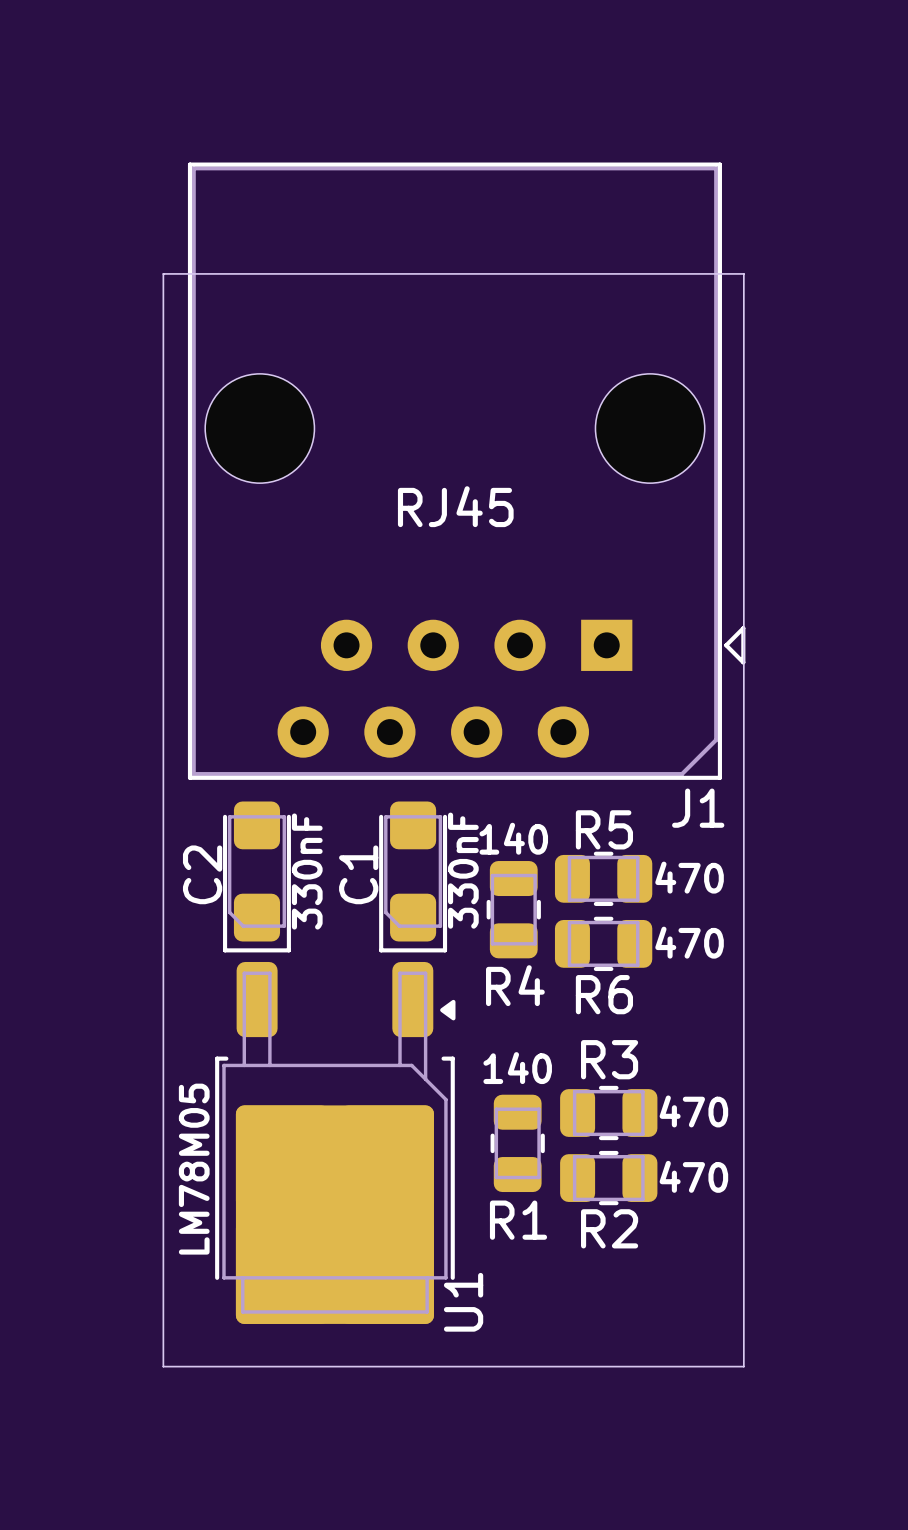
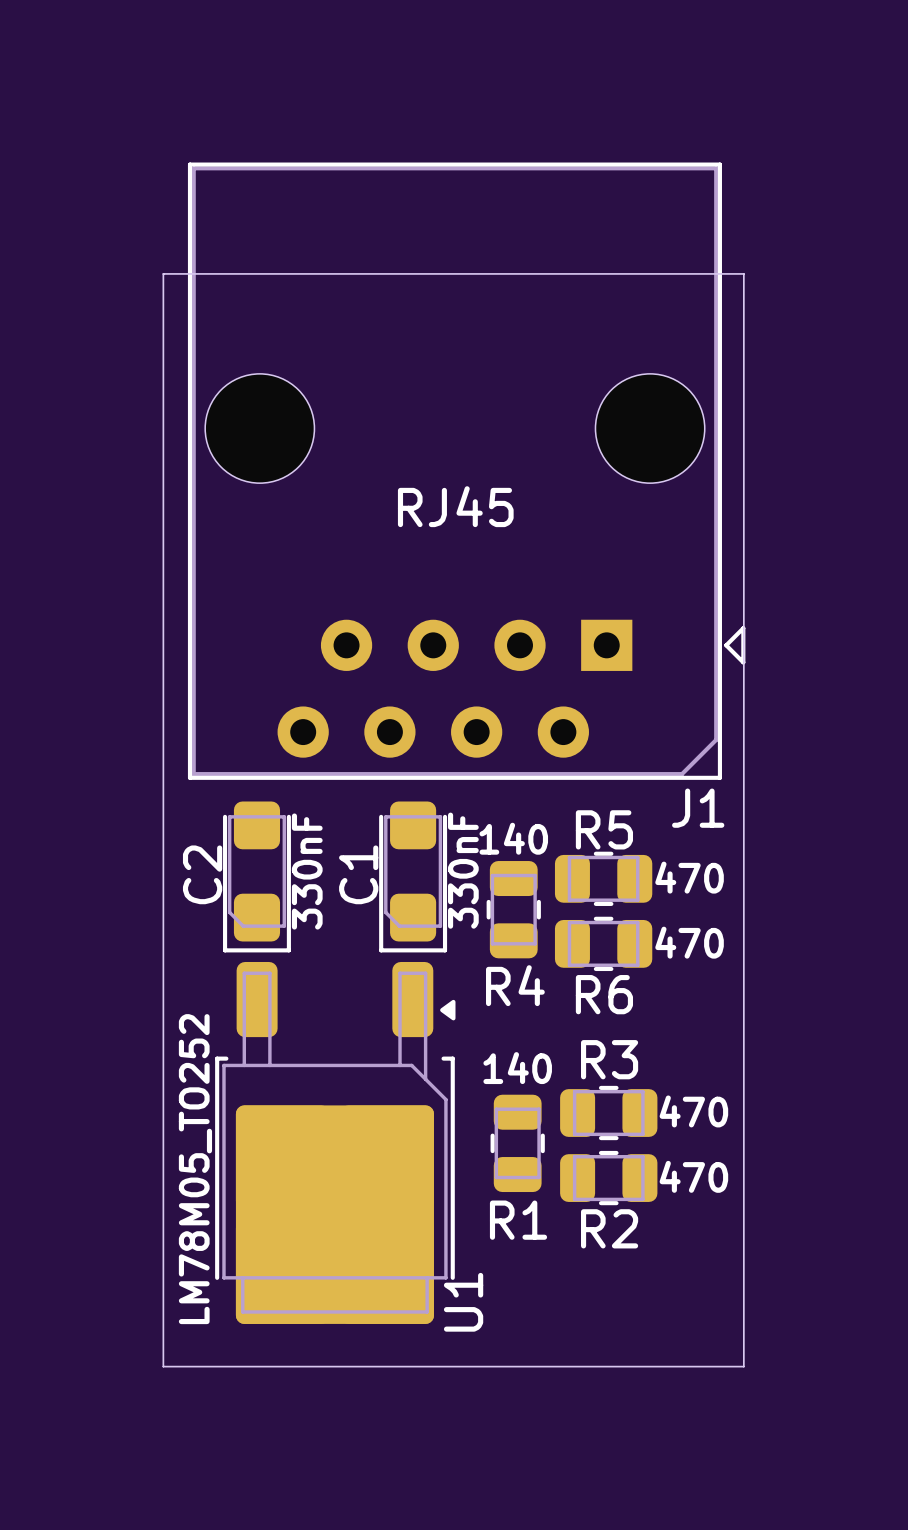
U1 value: LM78M05 (194, 1169) -> LM78M05_TO252 (195, 1169)

